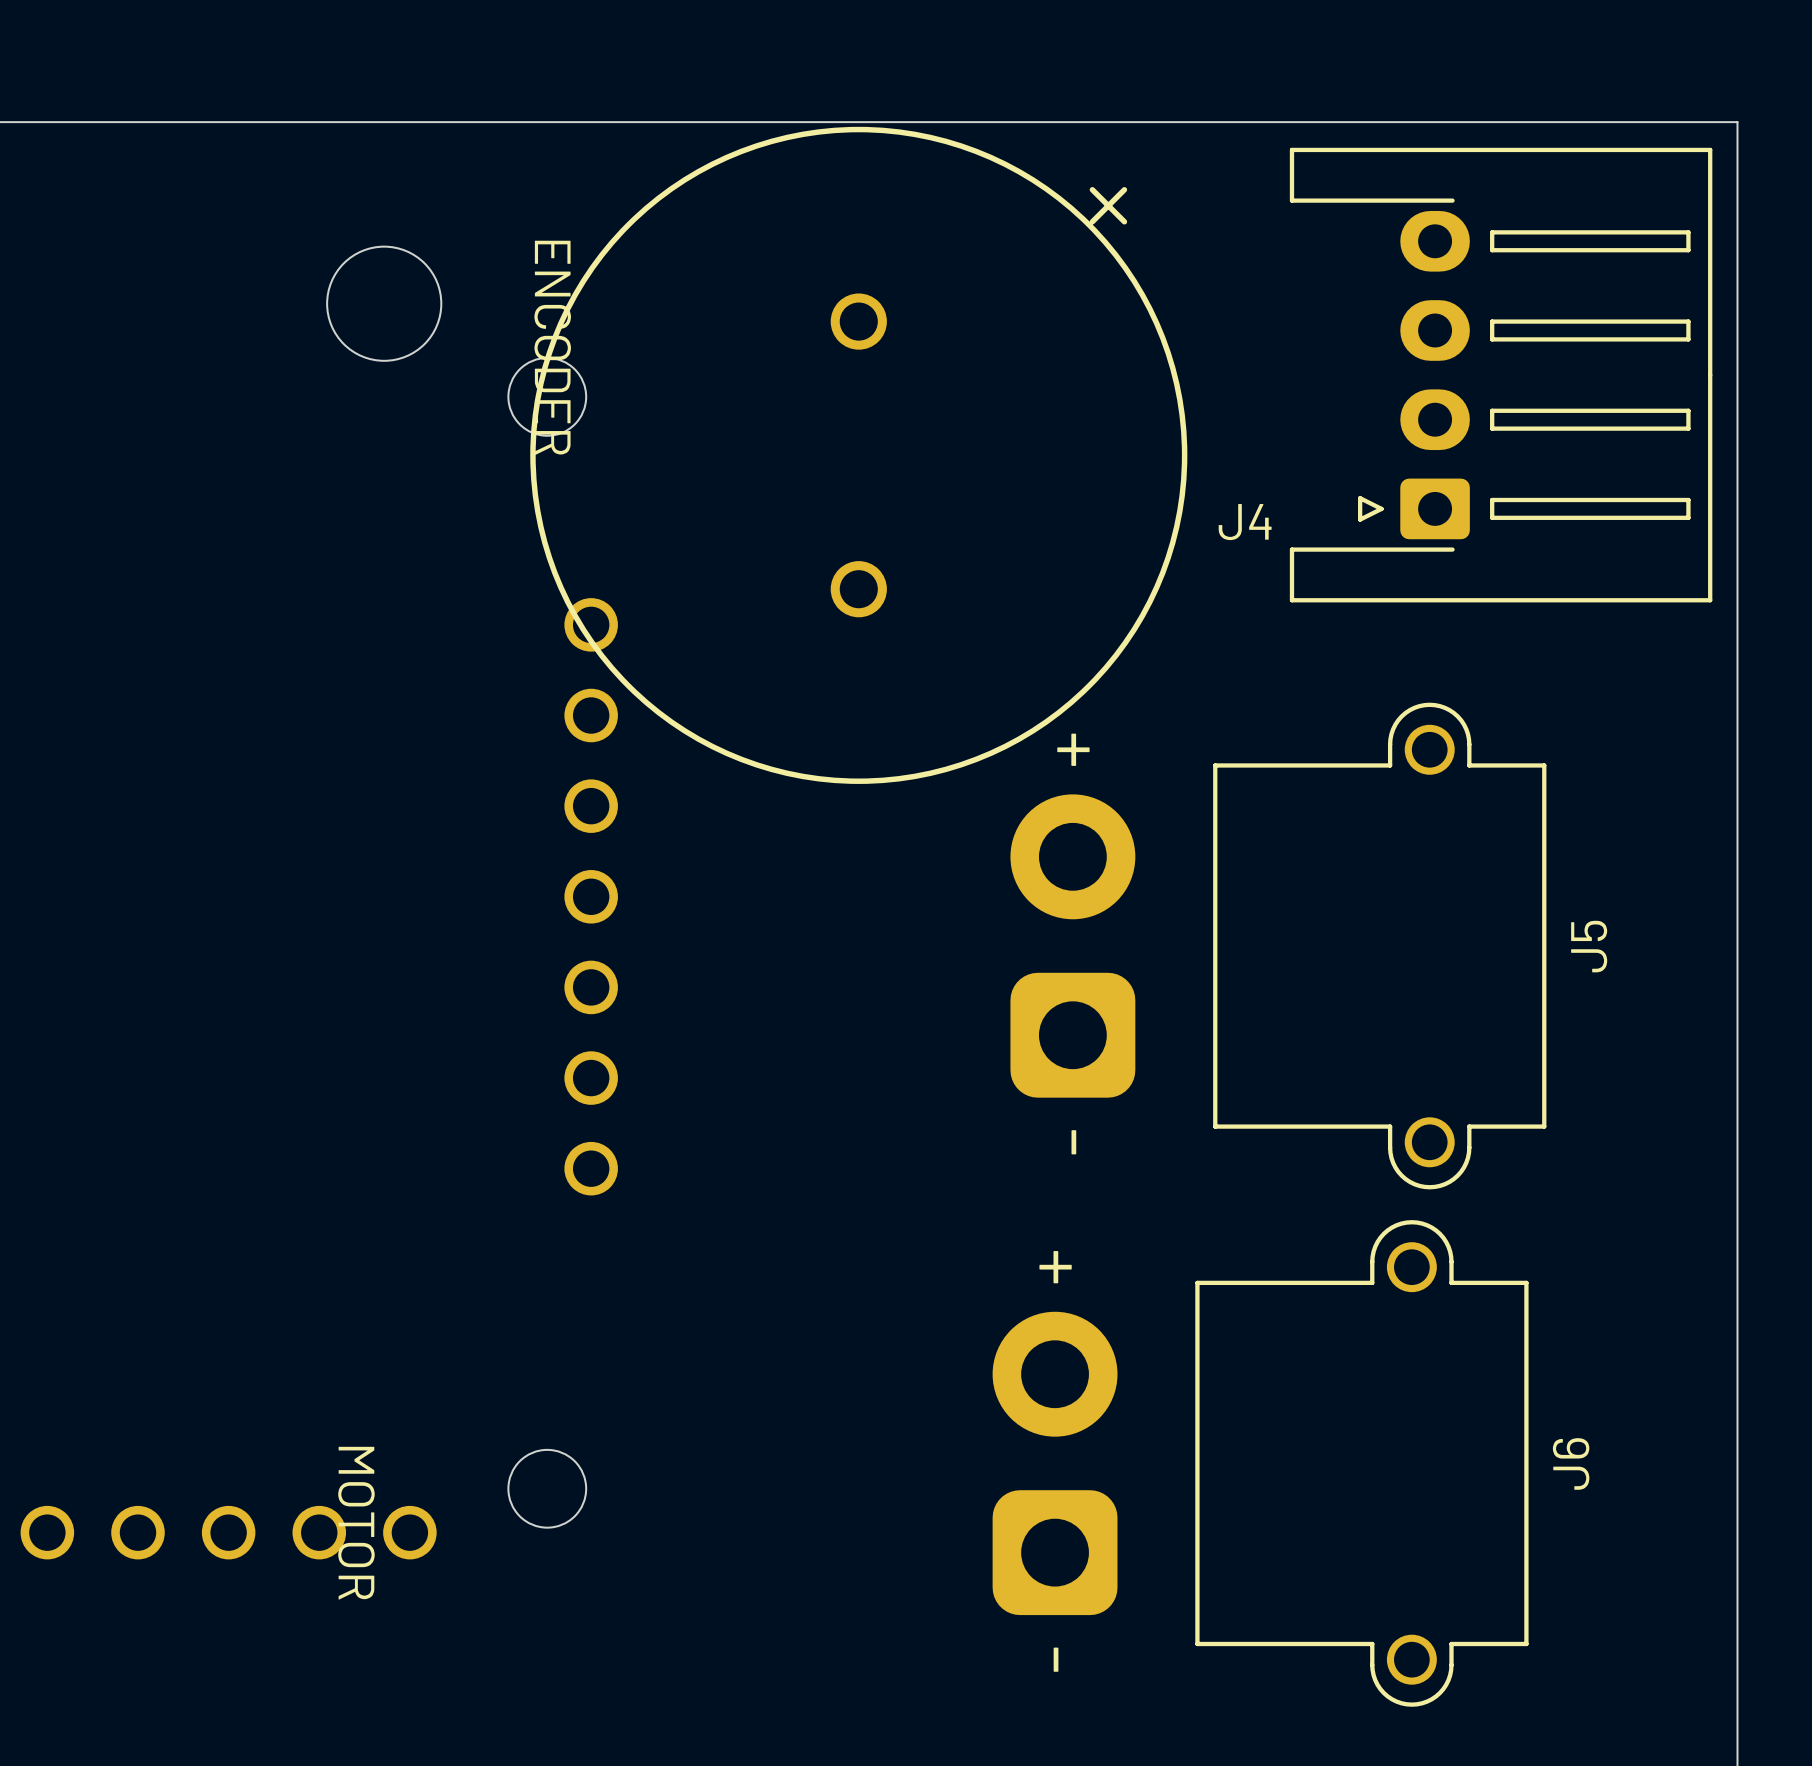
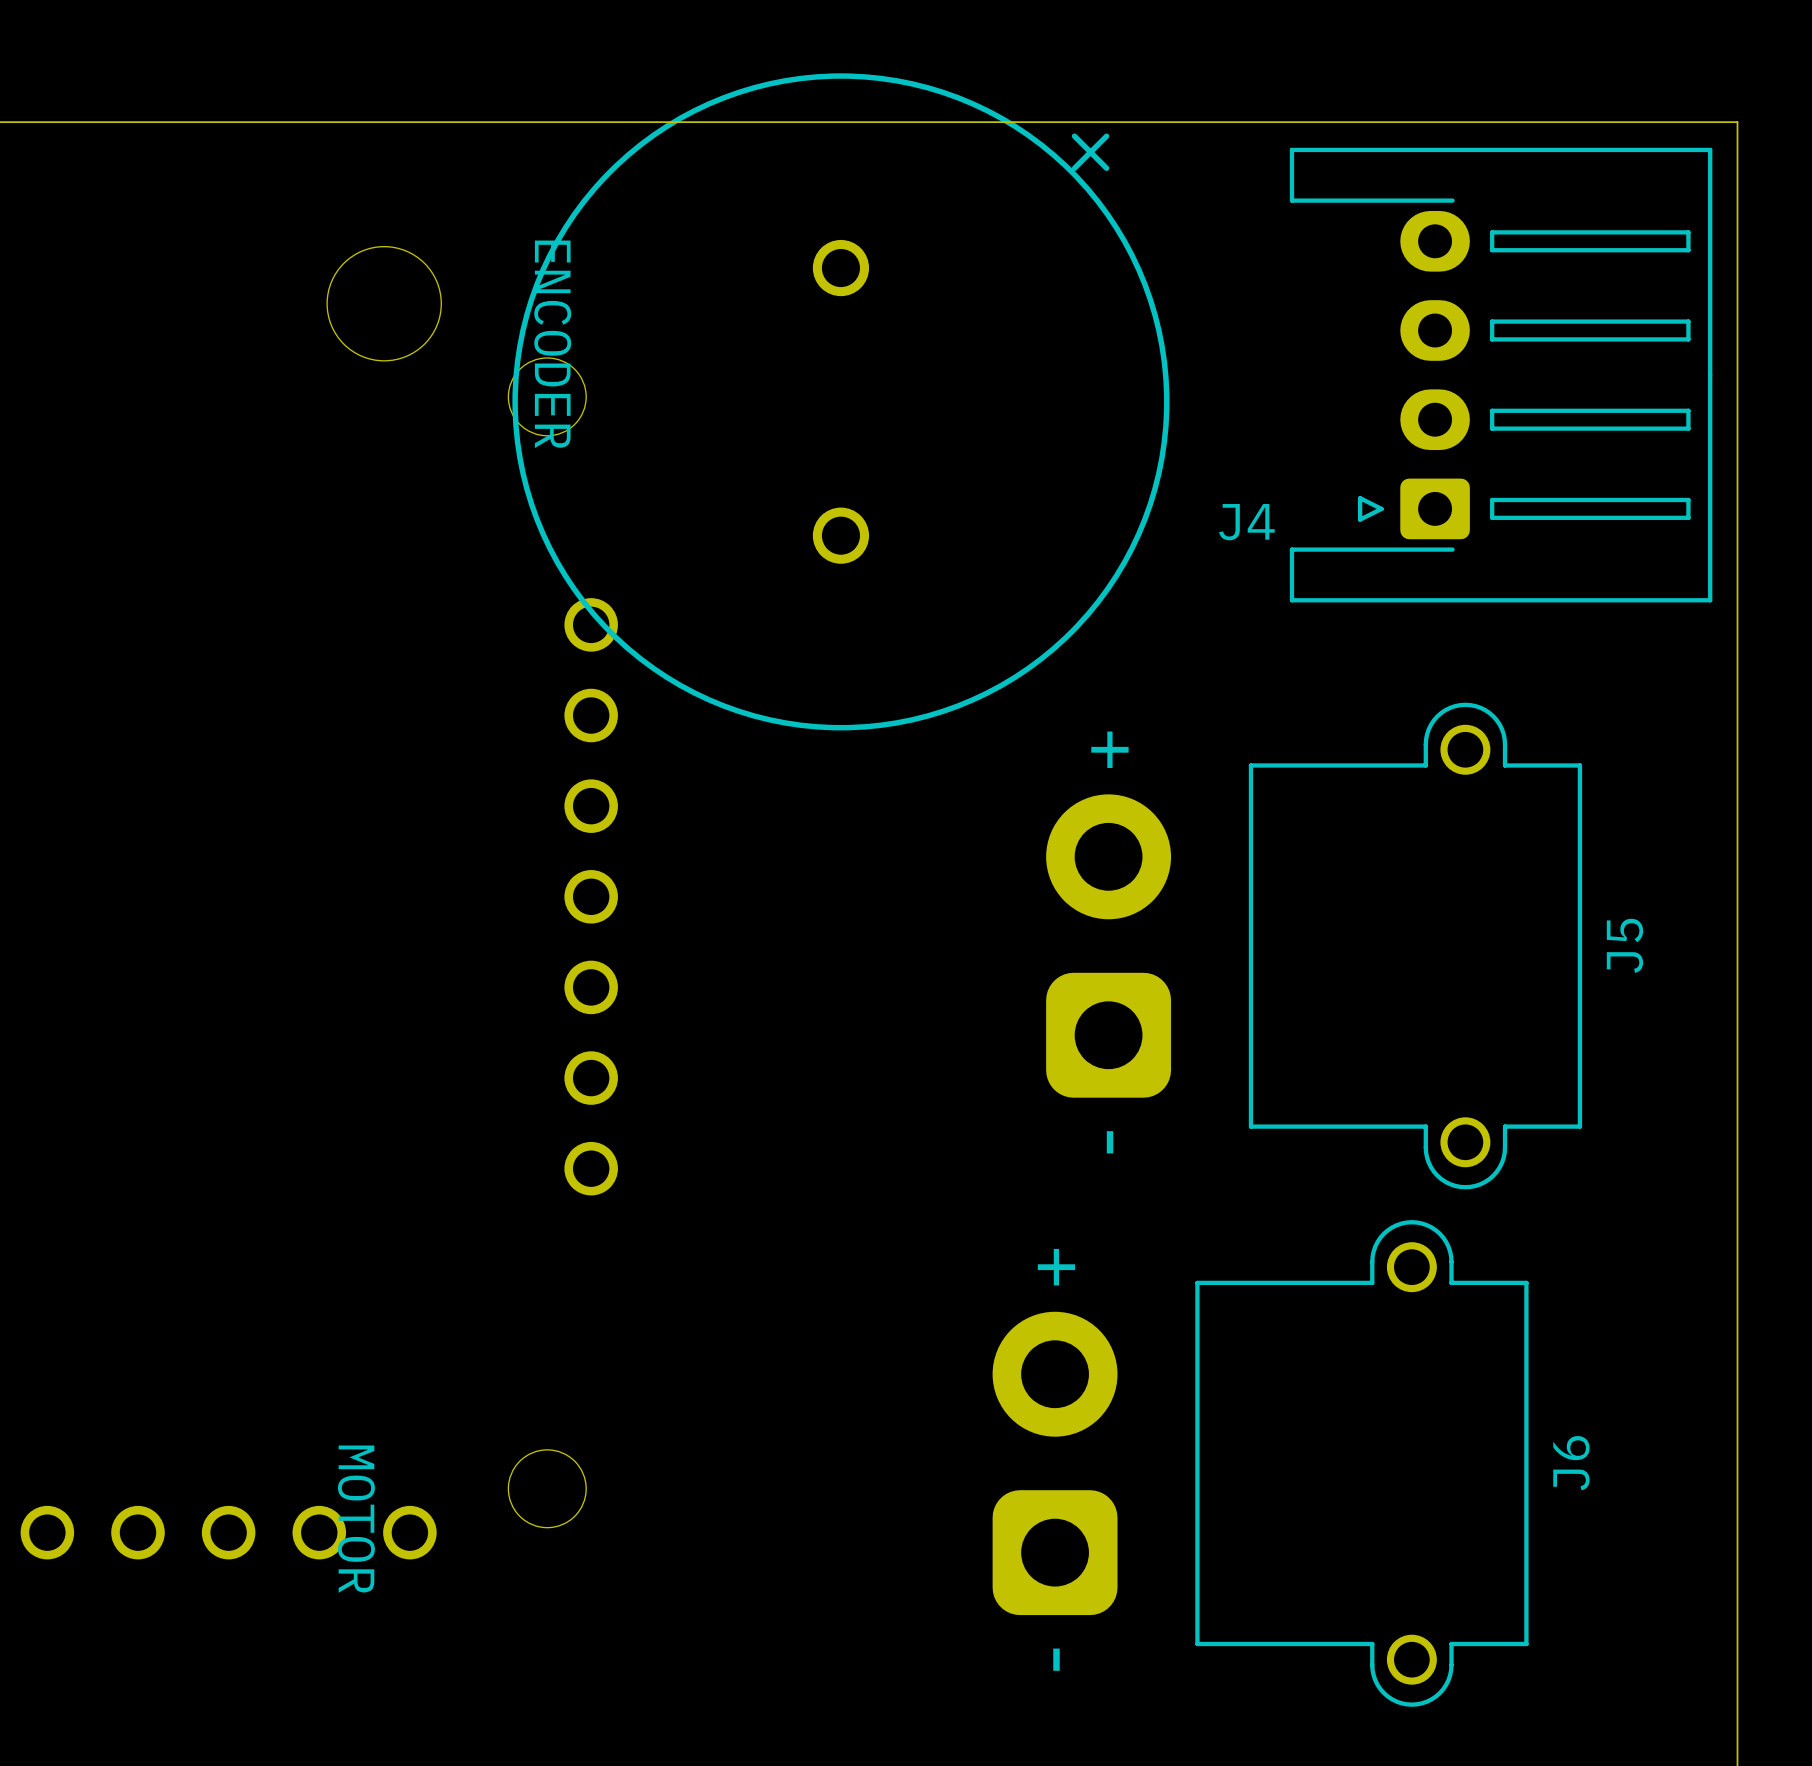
part position: (858, 455) -> (840, 401)
J5 position: (1278, 946) -> (1314, 946)

